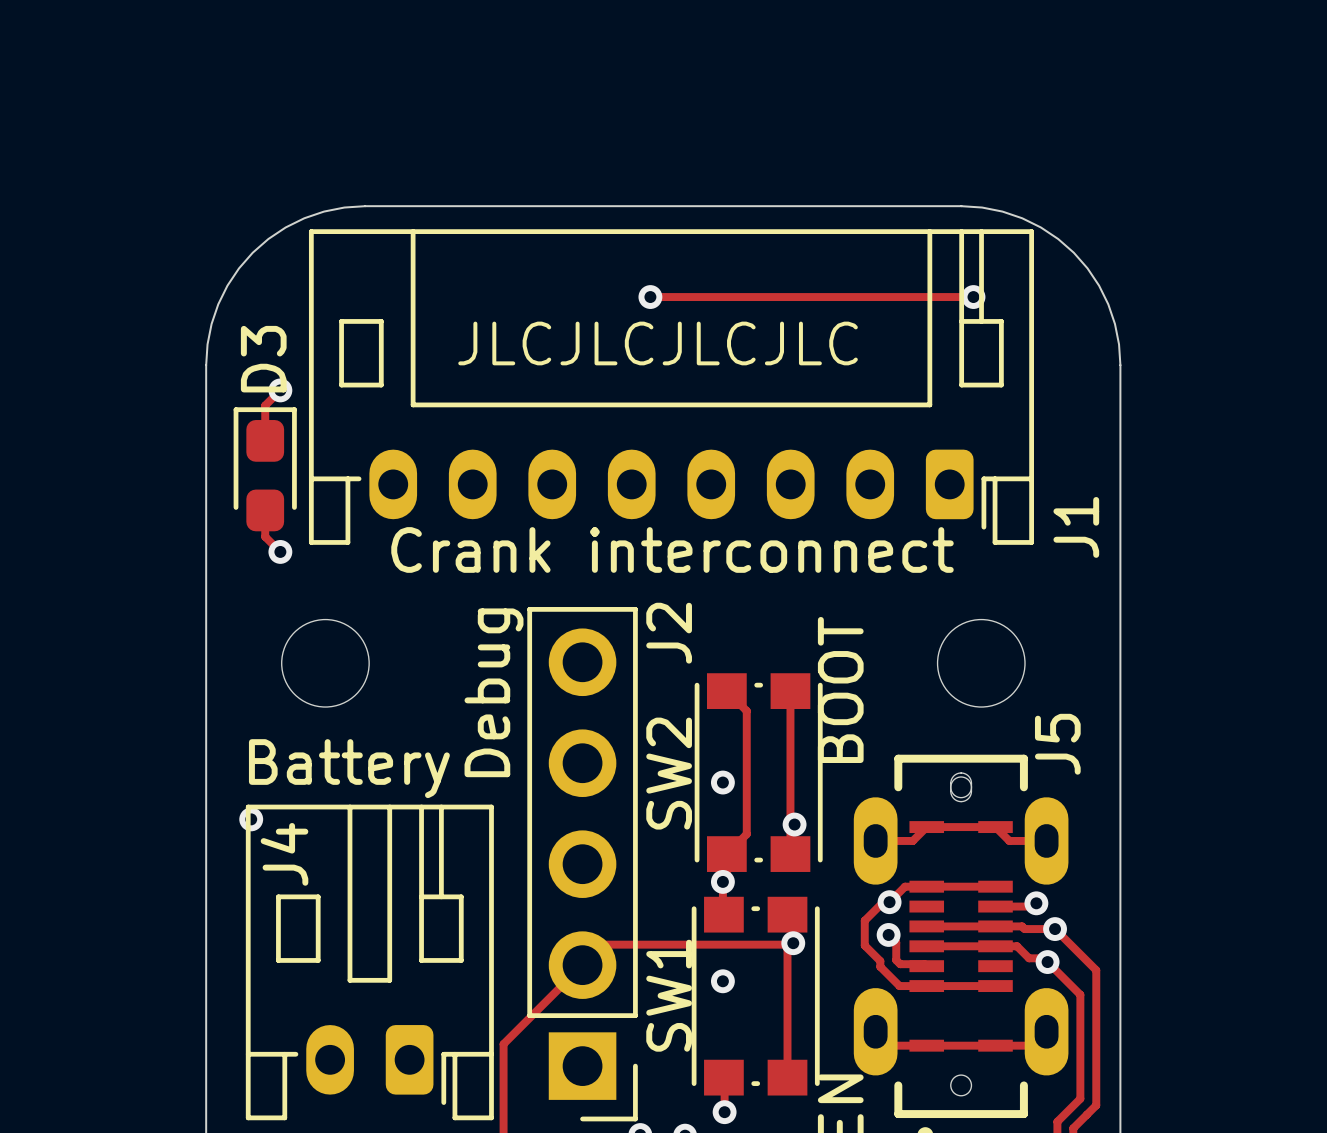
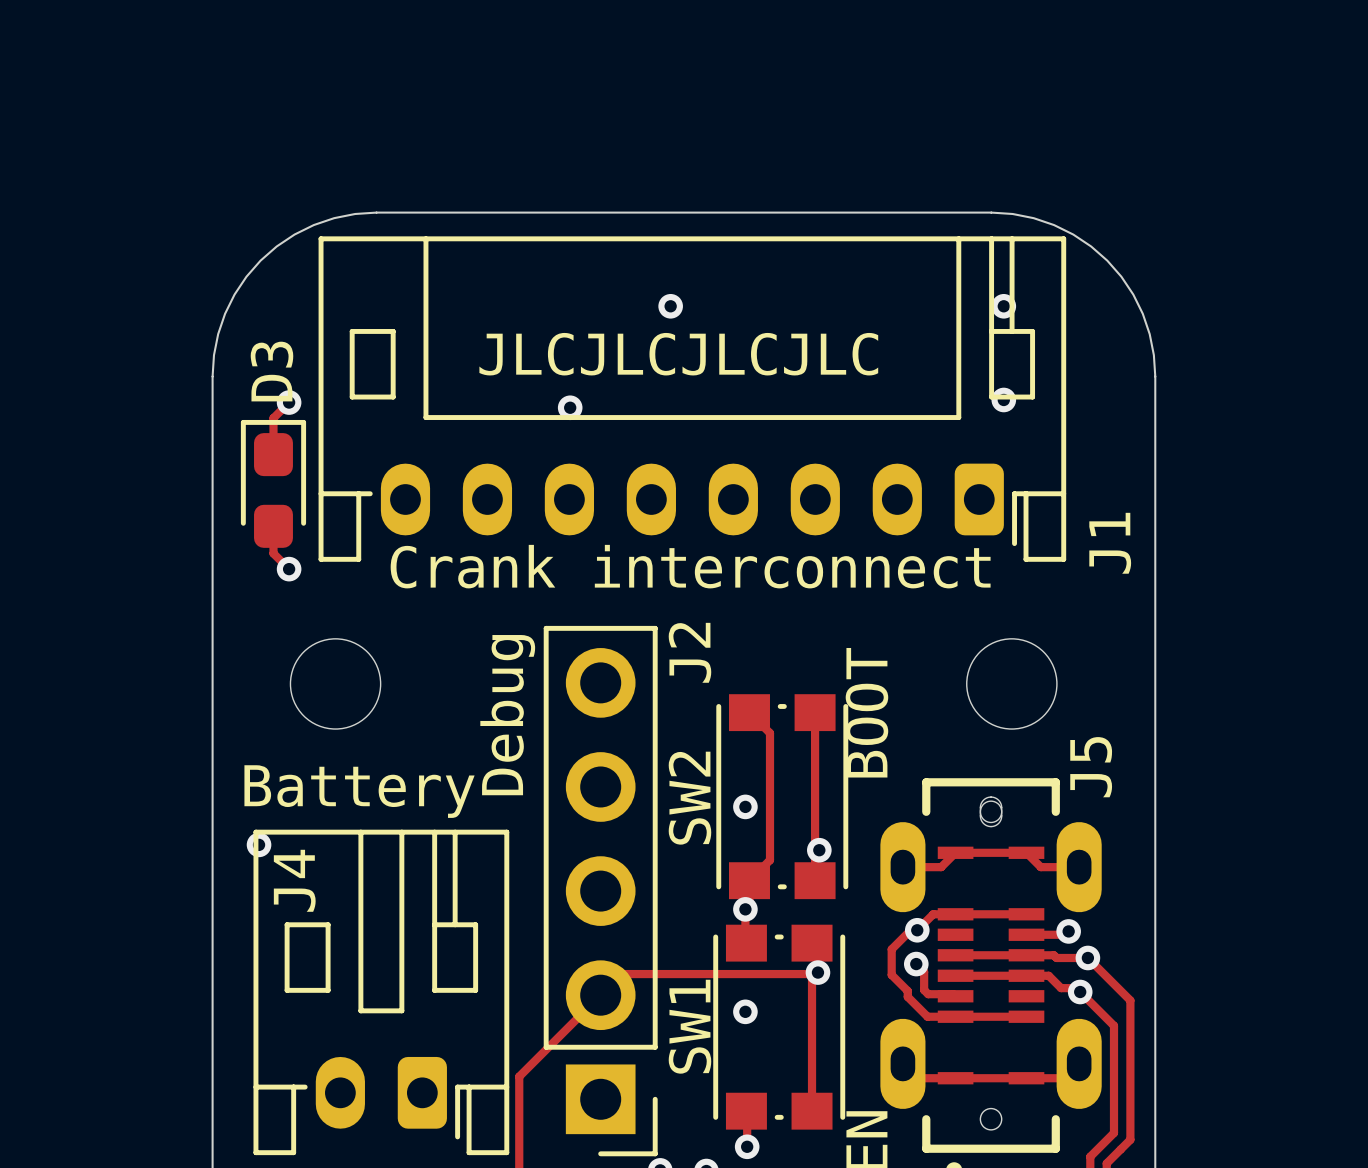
track: (650, 297) (973, 297) -> none
via: none -> (1003, 399)
via: none -> (570, 407)

